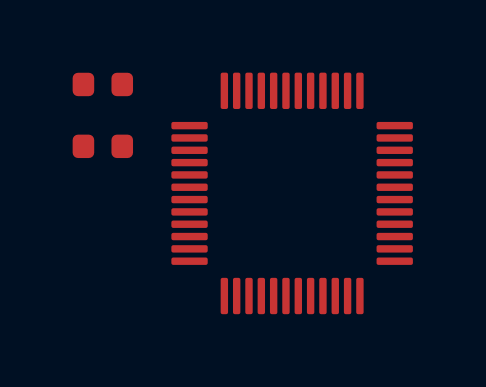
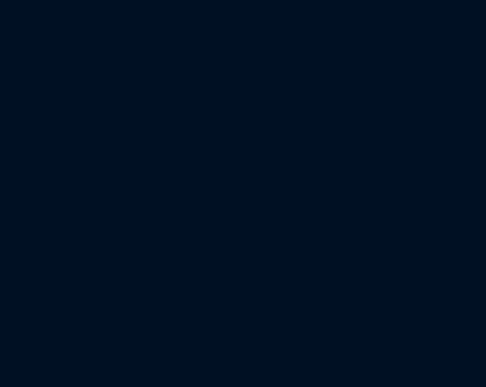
part: (102, 84) -> none
part: (102, 146) -> none
part: (292, 193) -> none

